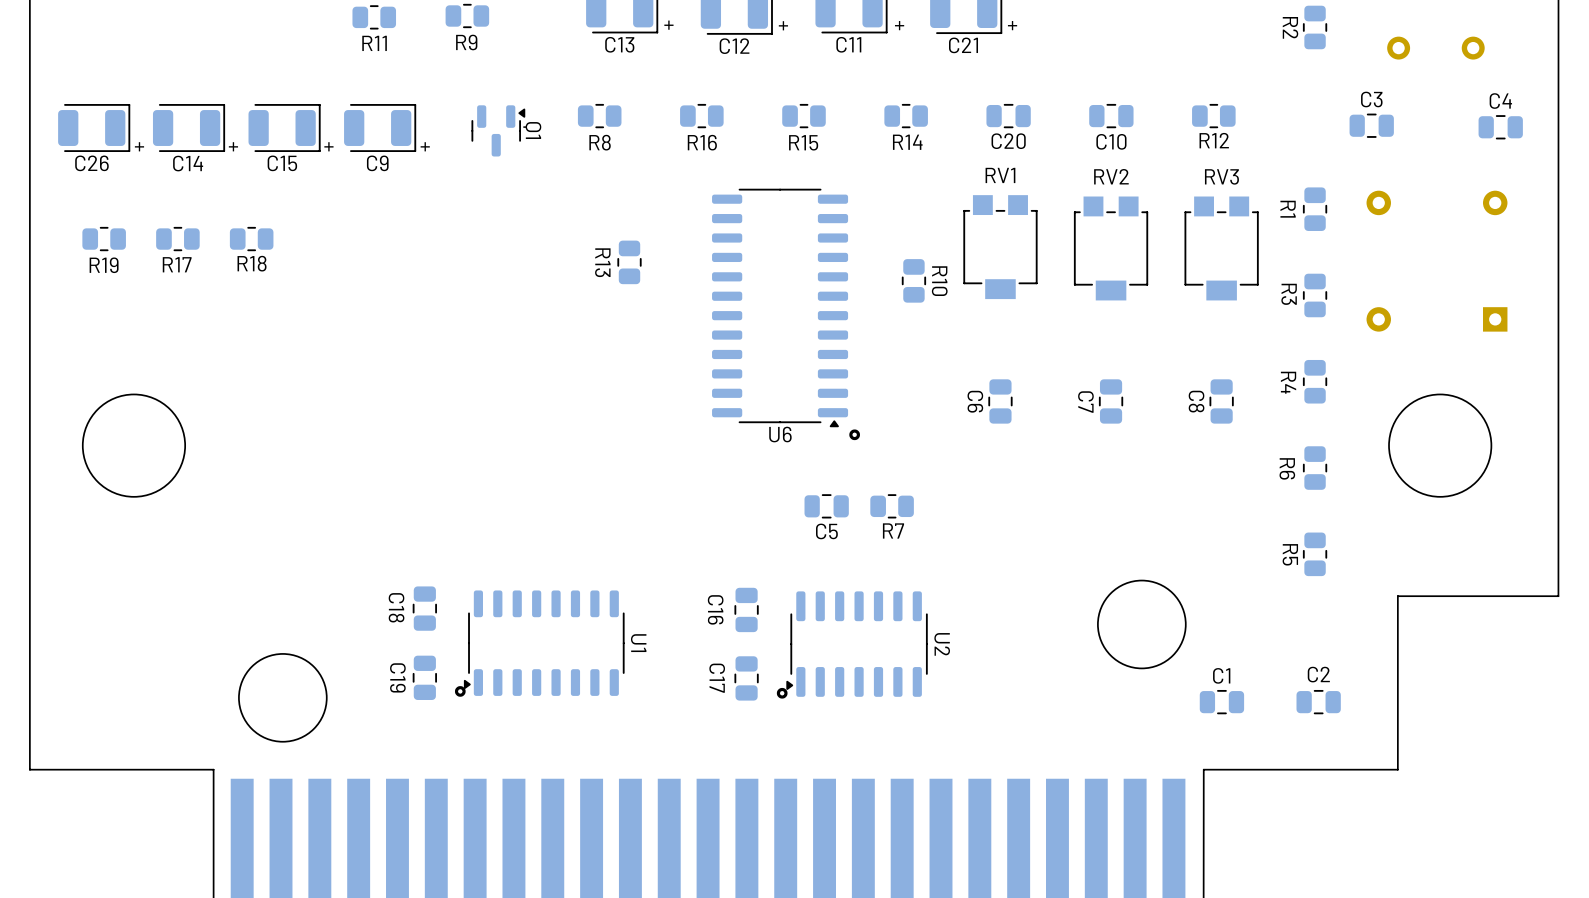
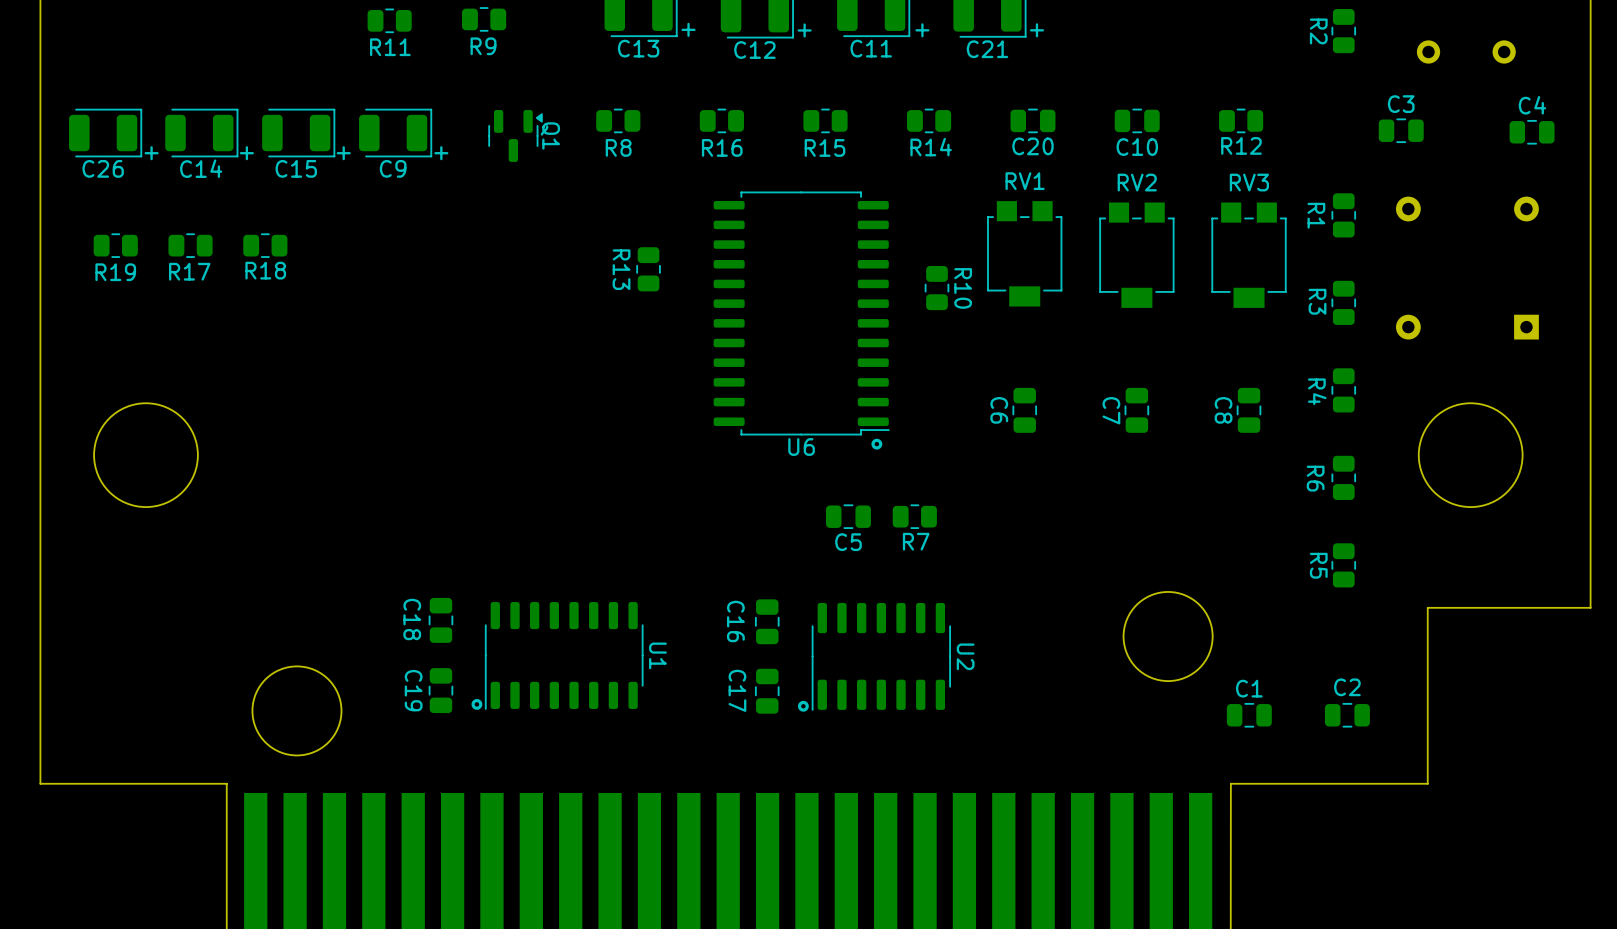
U6 footprint: [712, 188, 849, 428] -> [713, 191, 890, 436]
U1 footprint: [463, 590, 625, 696] -> [484, 602, 644, 710]
U2 footprint: [786, 591, 928, 697] -> [811, 602, 952, 711]

